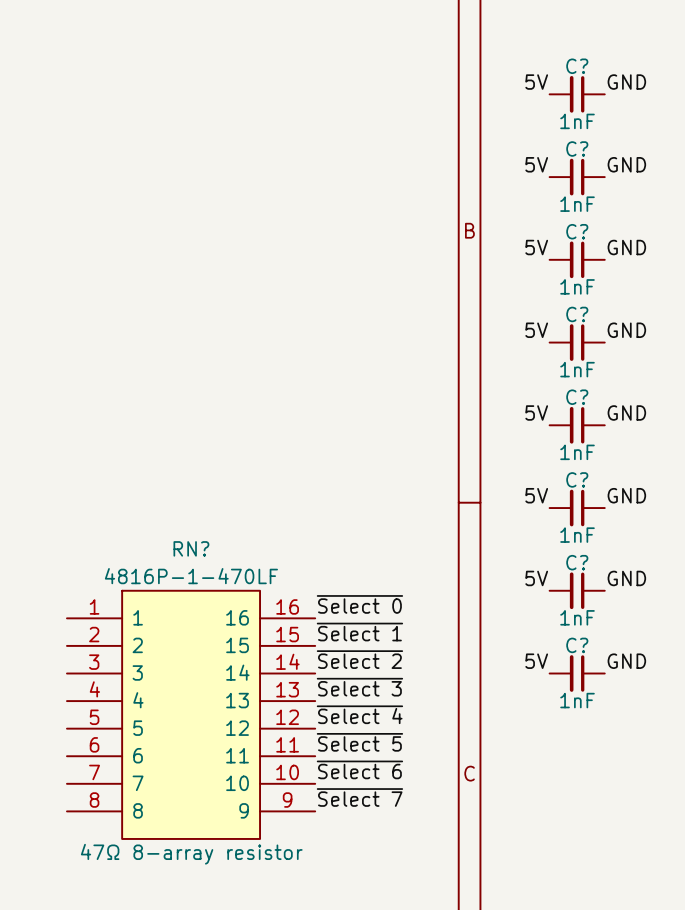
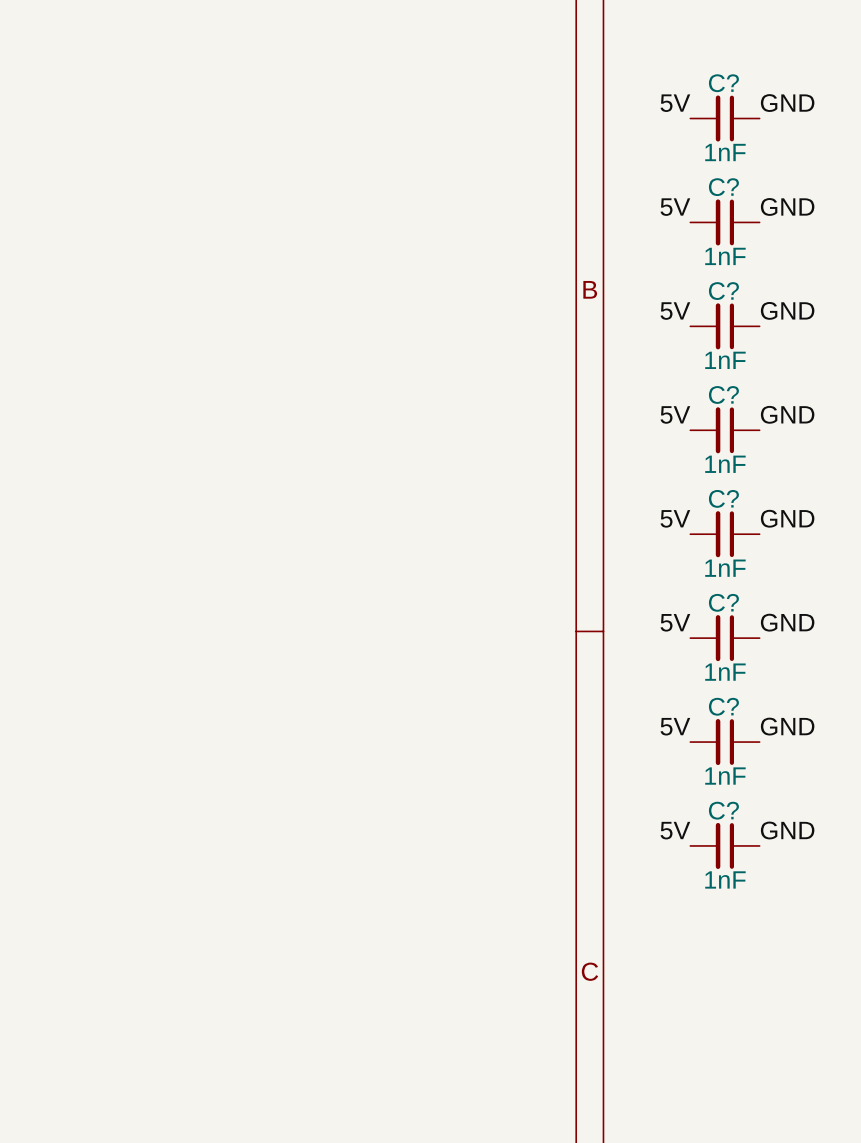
label: ~{Select 0} (359, 604) -> none
label: ~{Select 1} (359, 632) -> none
label: ~{Select 2} (359, 659) -> none
label: ~{Select 3} (359, 687) -> none
RN?: 4816P-1-470LF (191, 714) -> none
label: ~{Select 4} (359, 714) -> none
label: ~{Select 5} (359, 742) -> none
label: ~{Select 6} (359, 769) -> none
label: ~{Select 7} (359, 797) -> none

